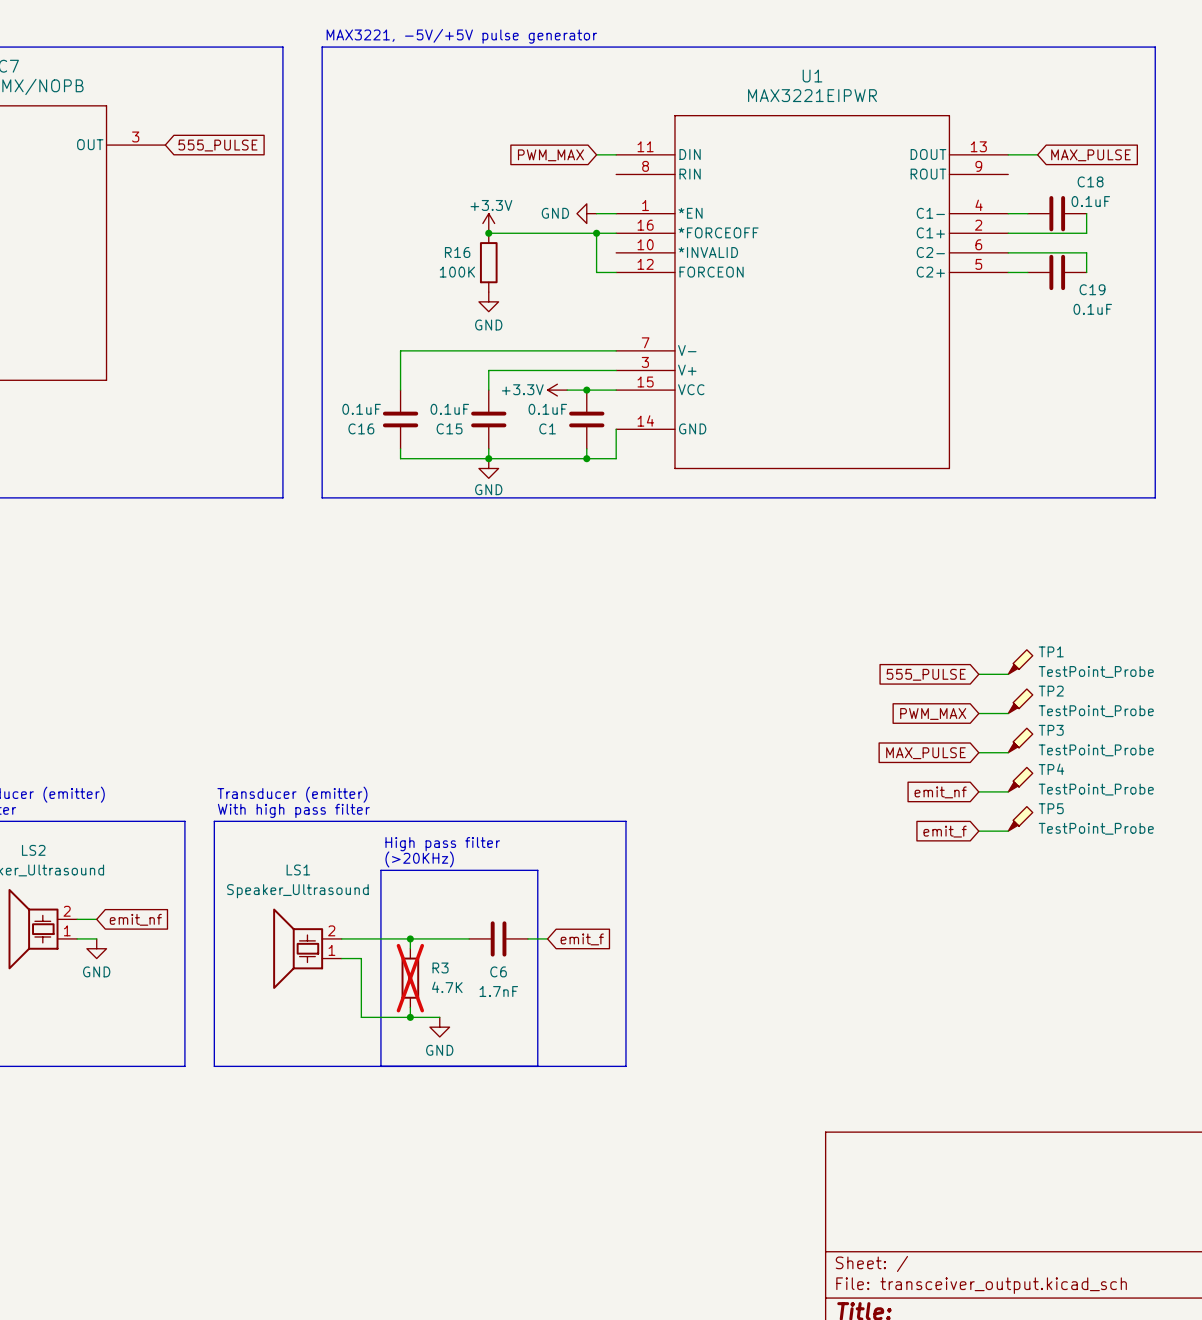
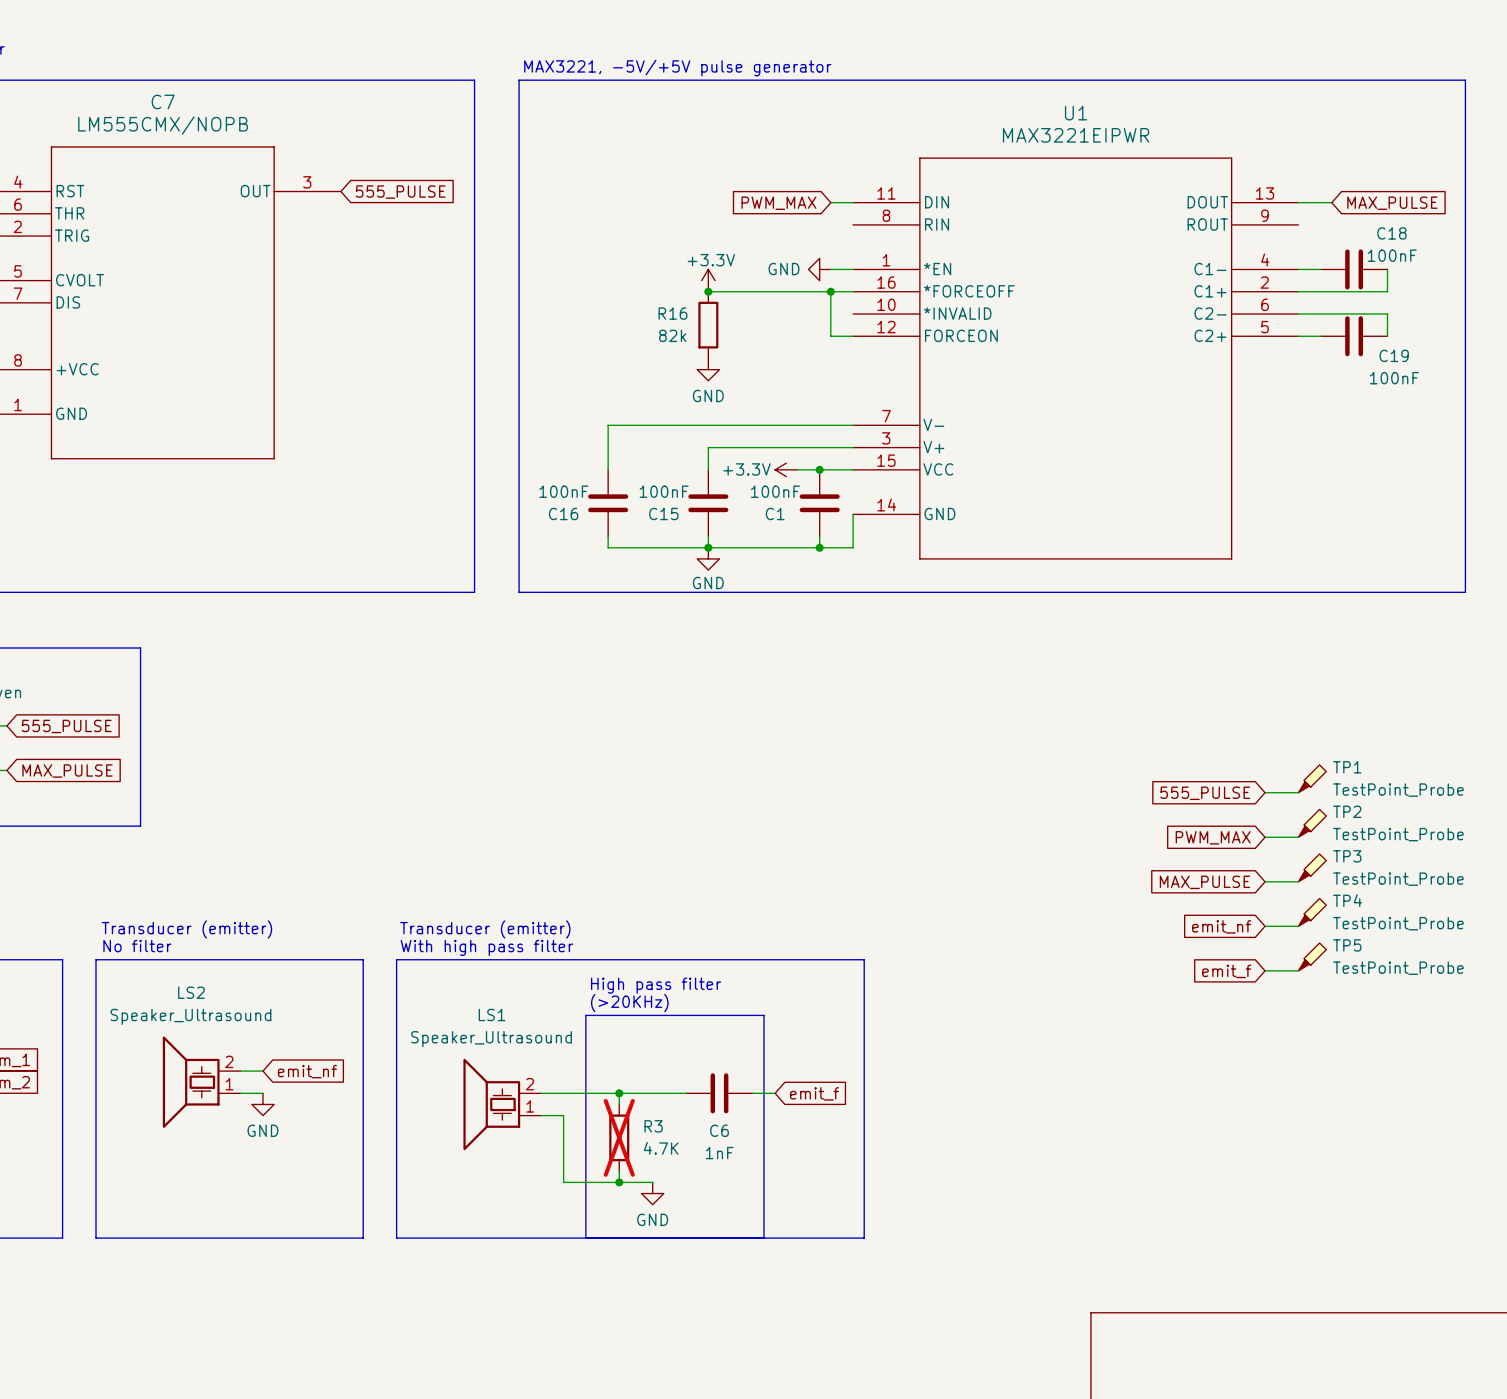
C18 value: 0.1uF (1090, 201) -> 100nF (1392, 255)
R16 value: 100K (457, 272) -> 82k (672, 335)
C19 value: 0.1uF (1092, 309) -> 100nF (1394, 378)
C16 value: 0.1uF (361, 409) -> 100nF (563, 491)
C15 value: 0.1uF (449, 409) -> 100nF (664, 491)
C1 value: 0.1uF (547, 409) -> 100nF (775, 491)
C6 value: 1.7nF (498, 991) -> 1nF (719, 1153)

